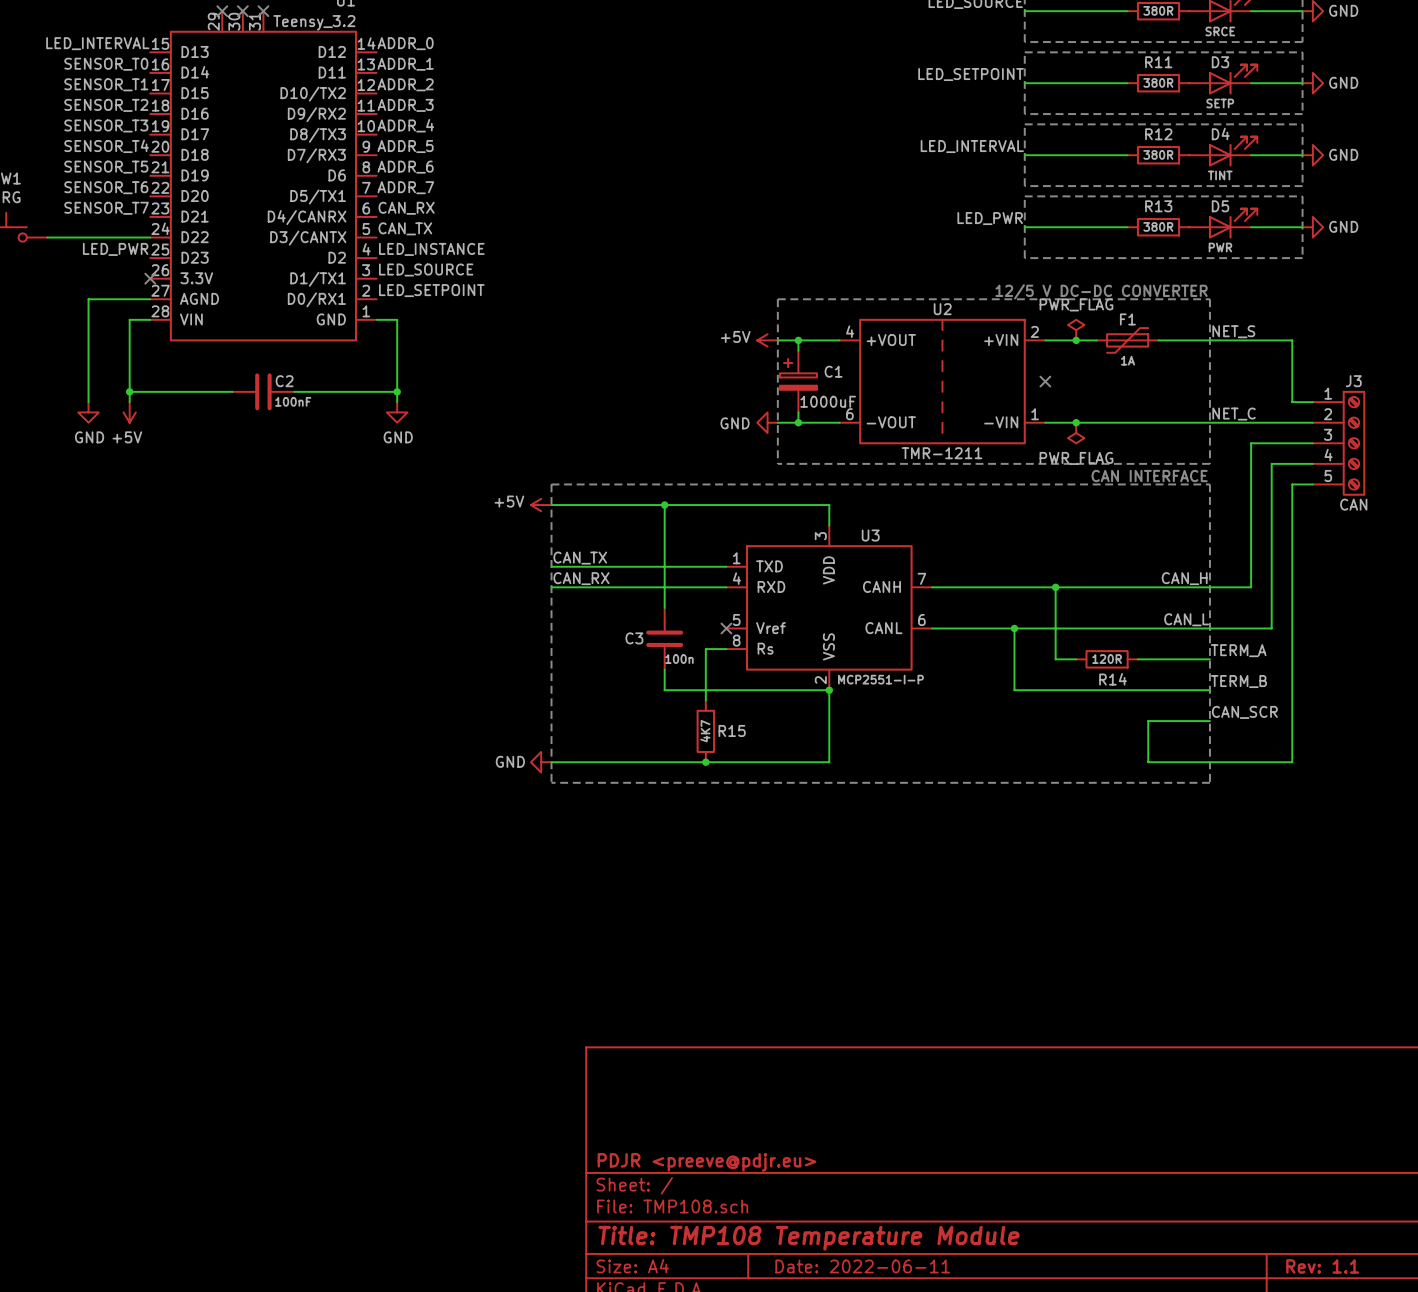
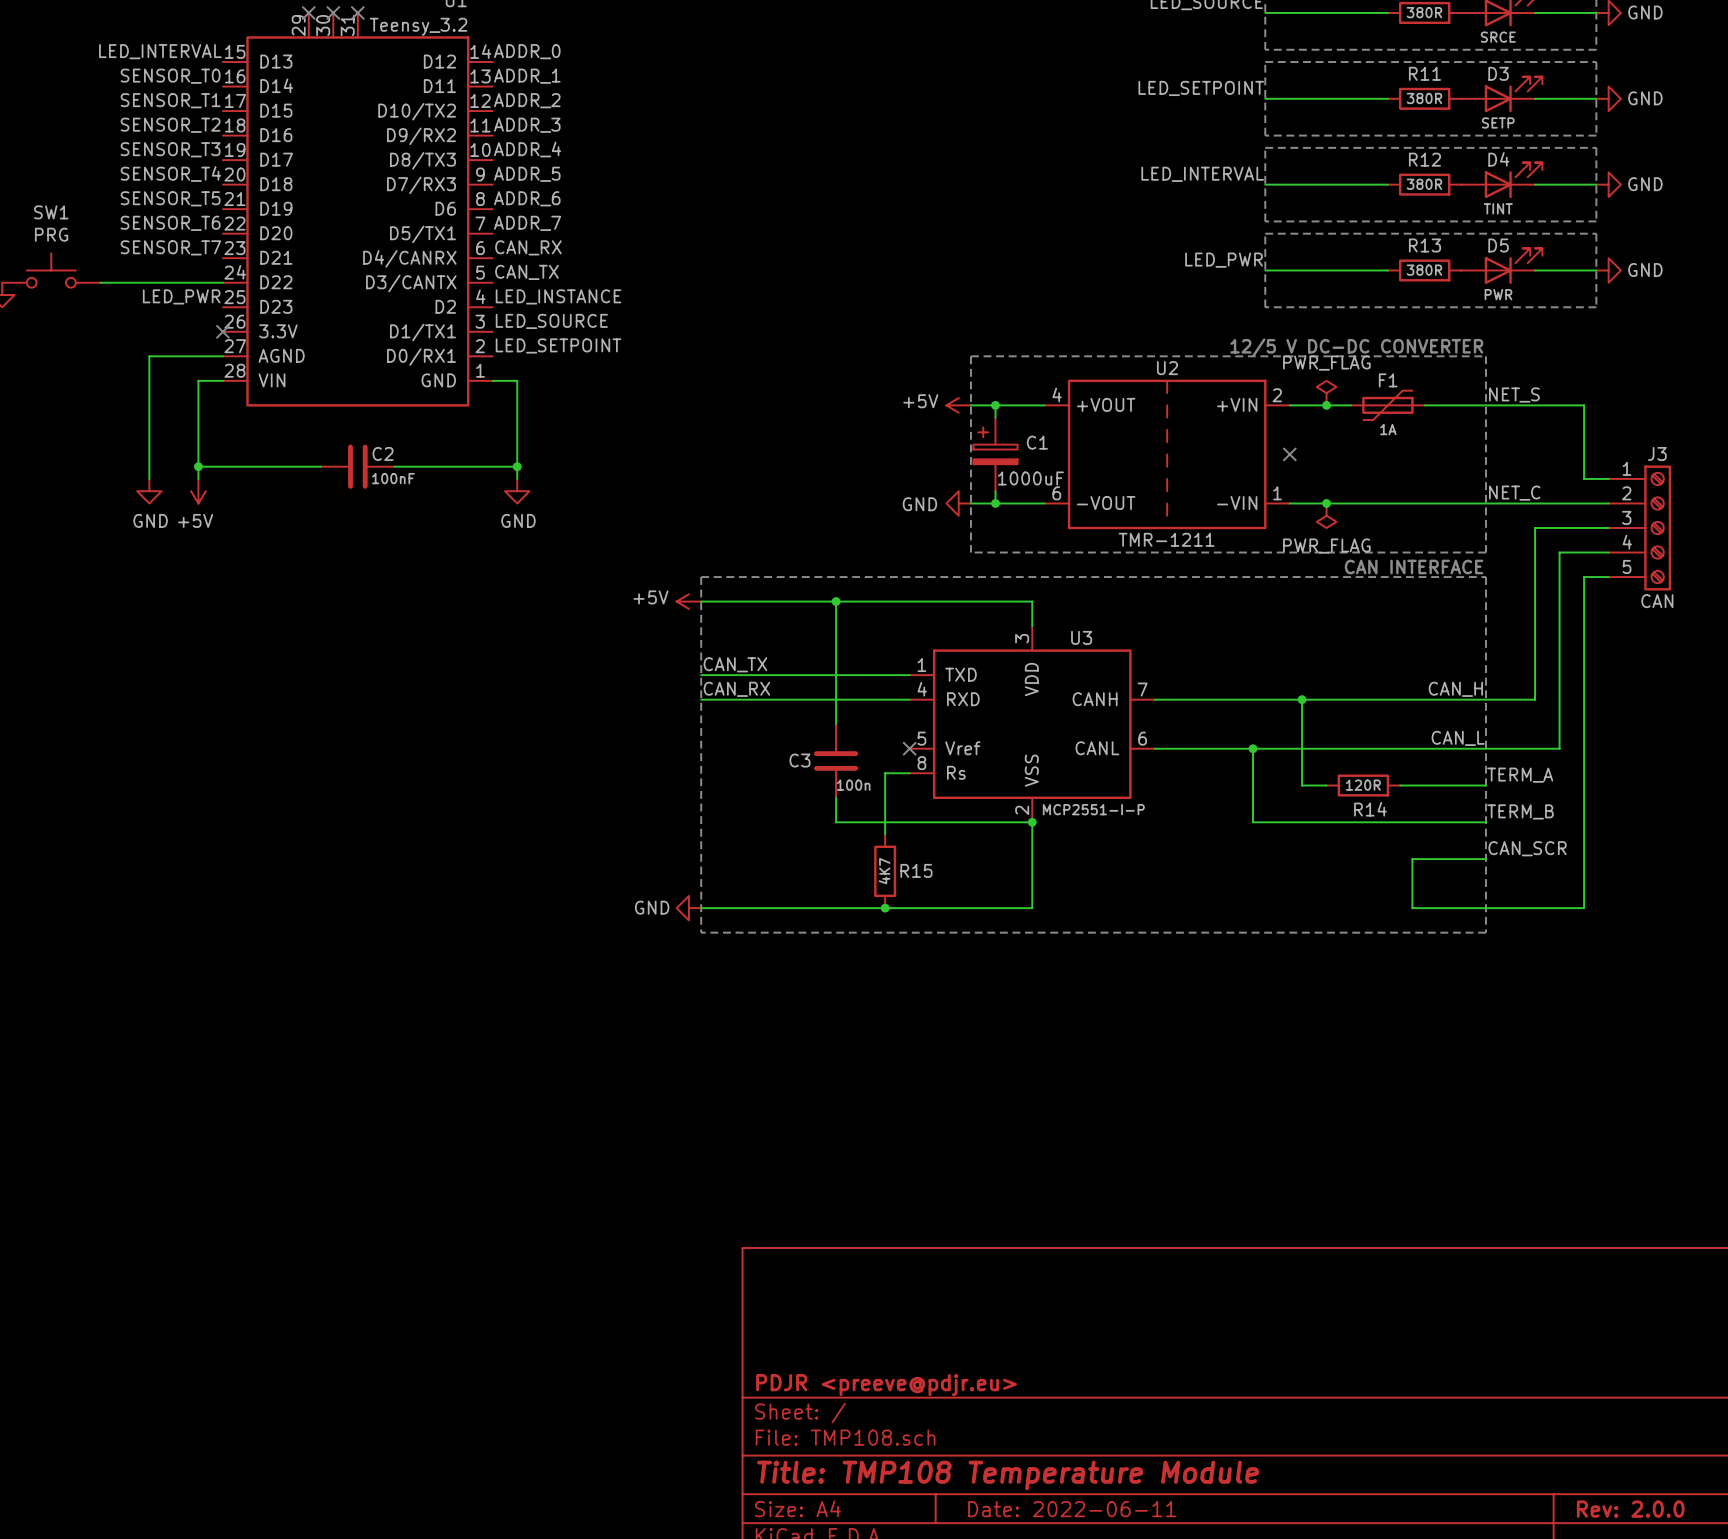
title block: Rev: 1.1 (1322, 1266) -> Rev: 2.0.0 (1630, 1509)

